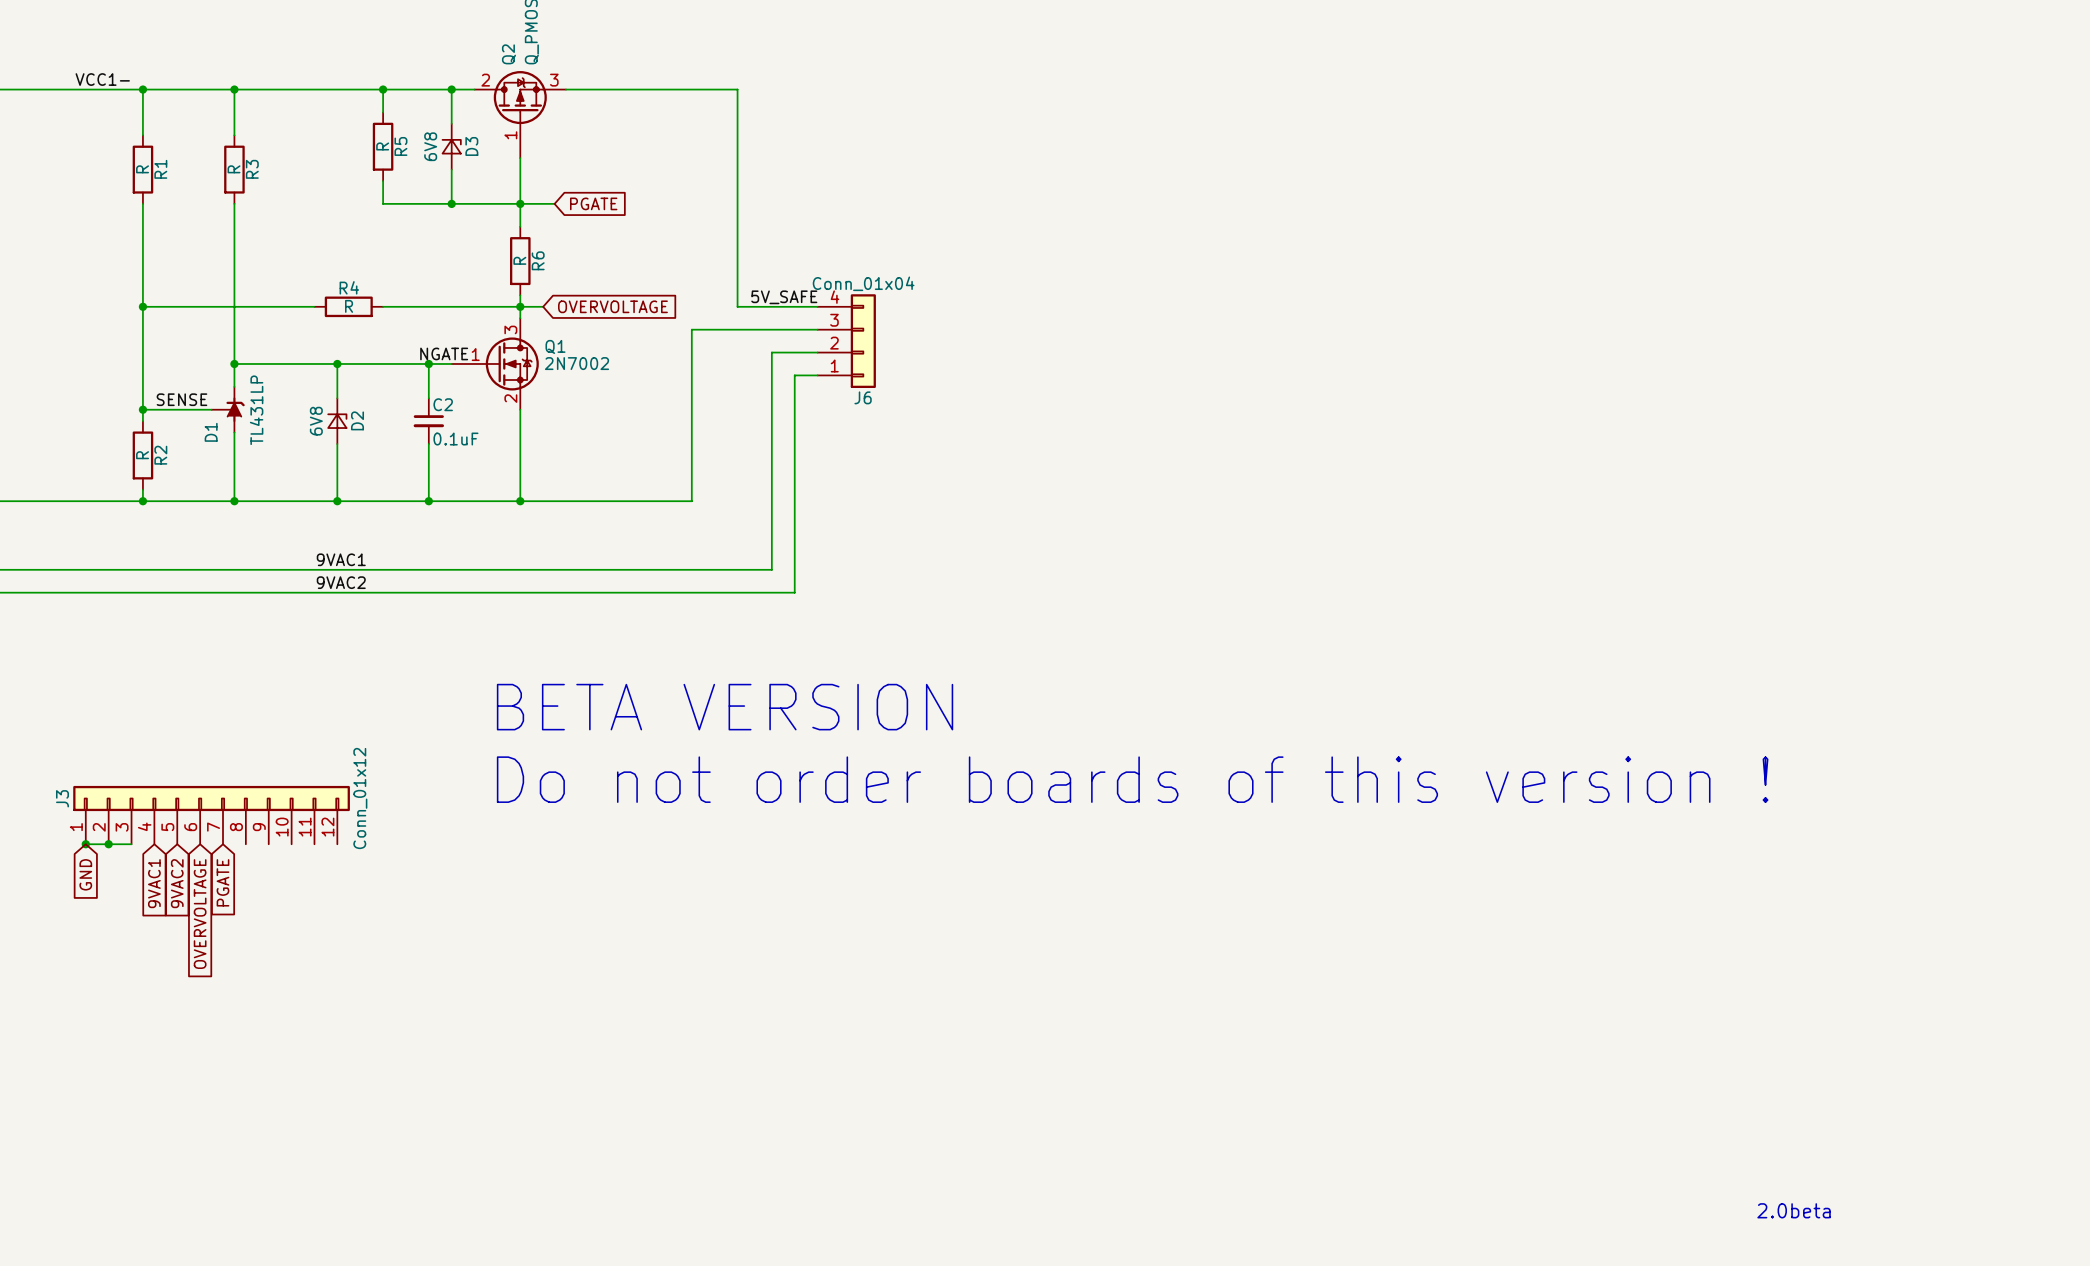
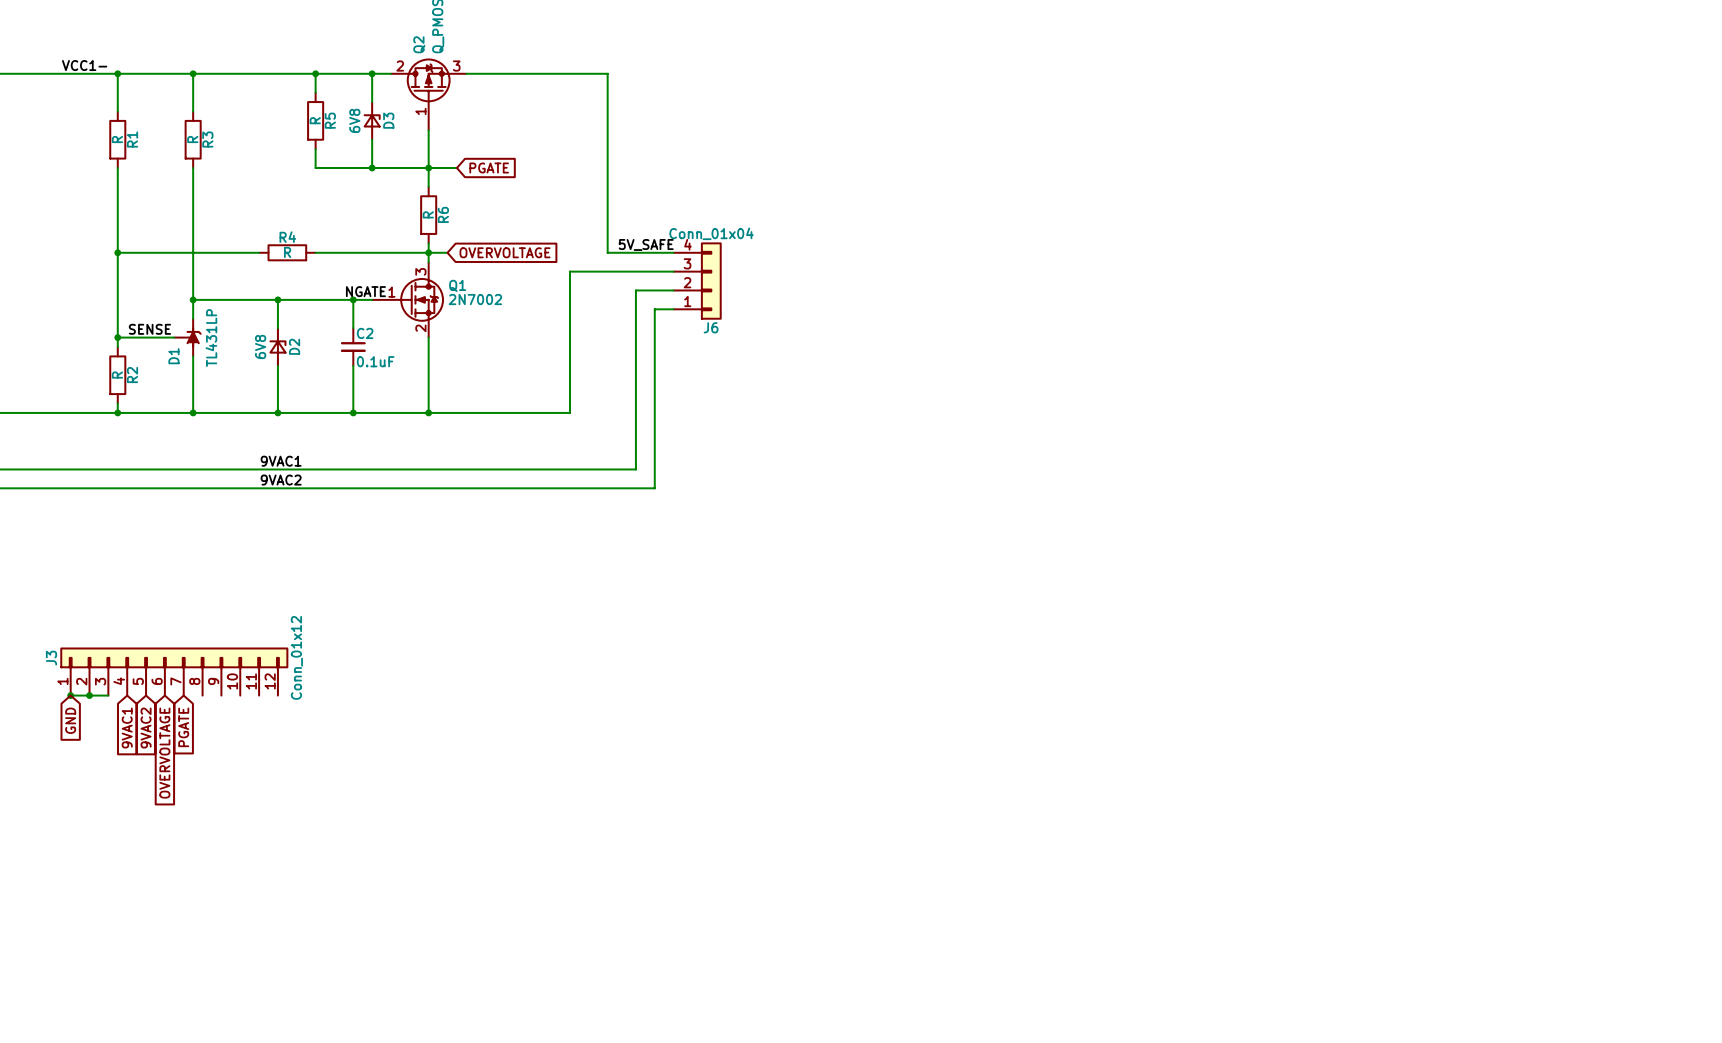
text: BETA VERSION (725, 707) -> none
text: Do not order boards of this version ! (1132, 779) -> none
text: 2.0beta (1794, 1210) -> none

